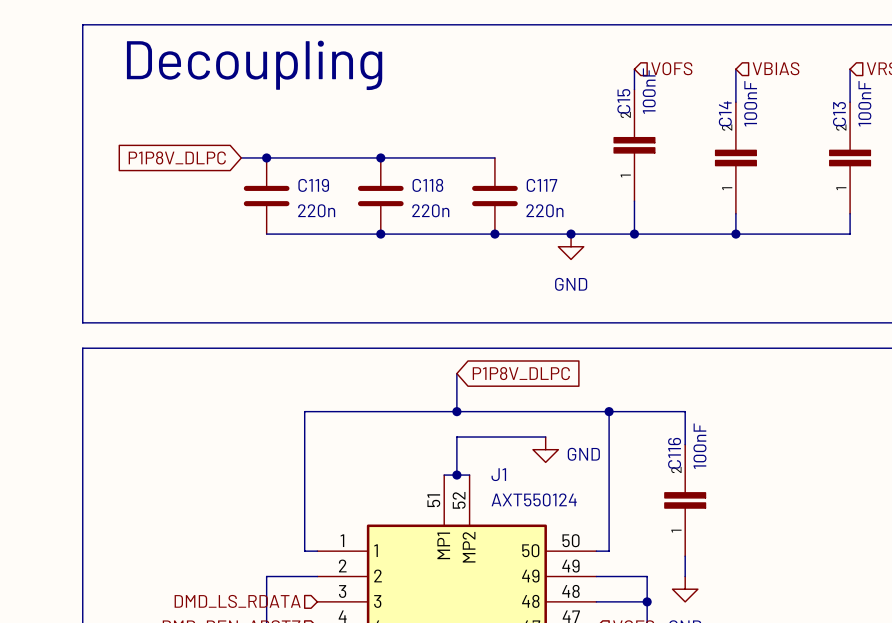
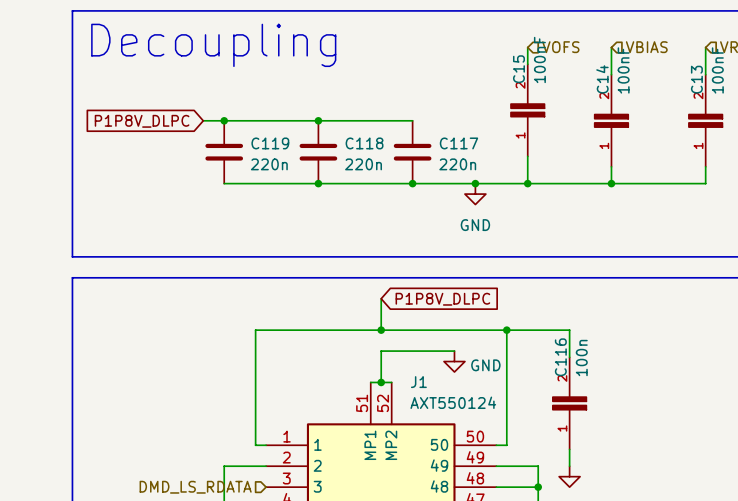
C116 value: 100nF (699, 446) -> 100n (581, 358)

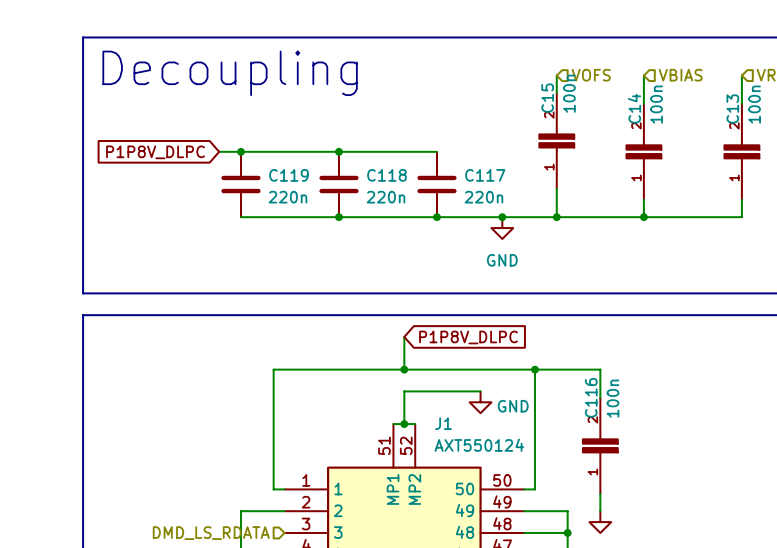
C15 value: 100nF (539, 59) -> 100n (569, 93)
C14 value: 100nF (623, 70) -> 100n (656, 104)
C13 value: 100nF (717, 70) -> 100n (754, 104)

